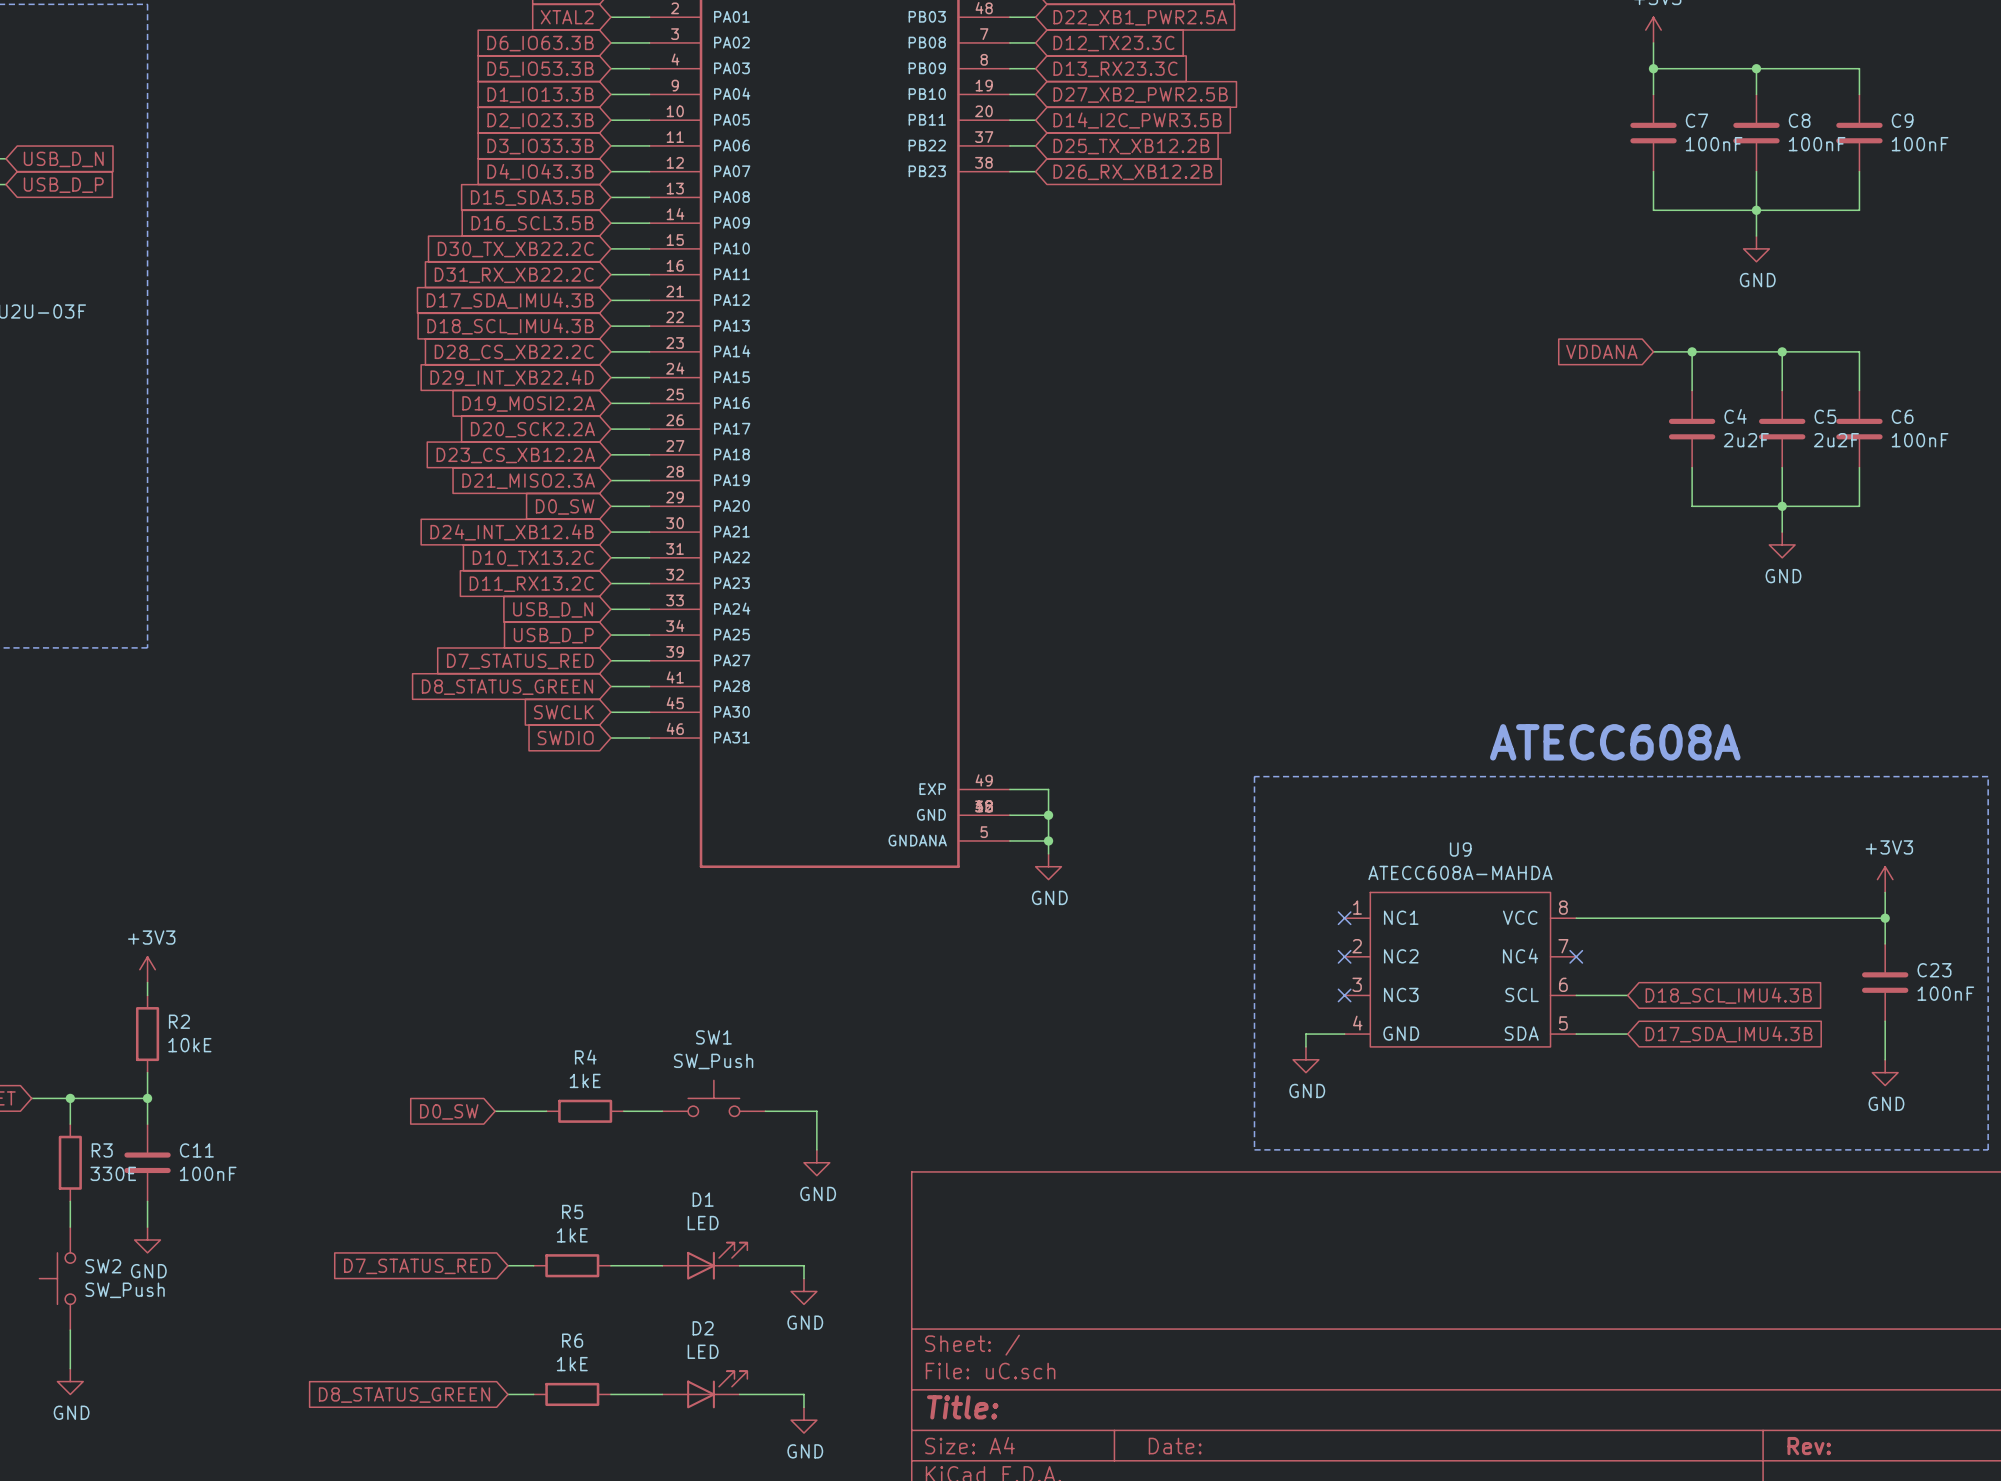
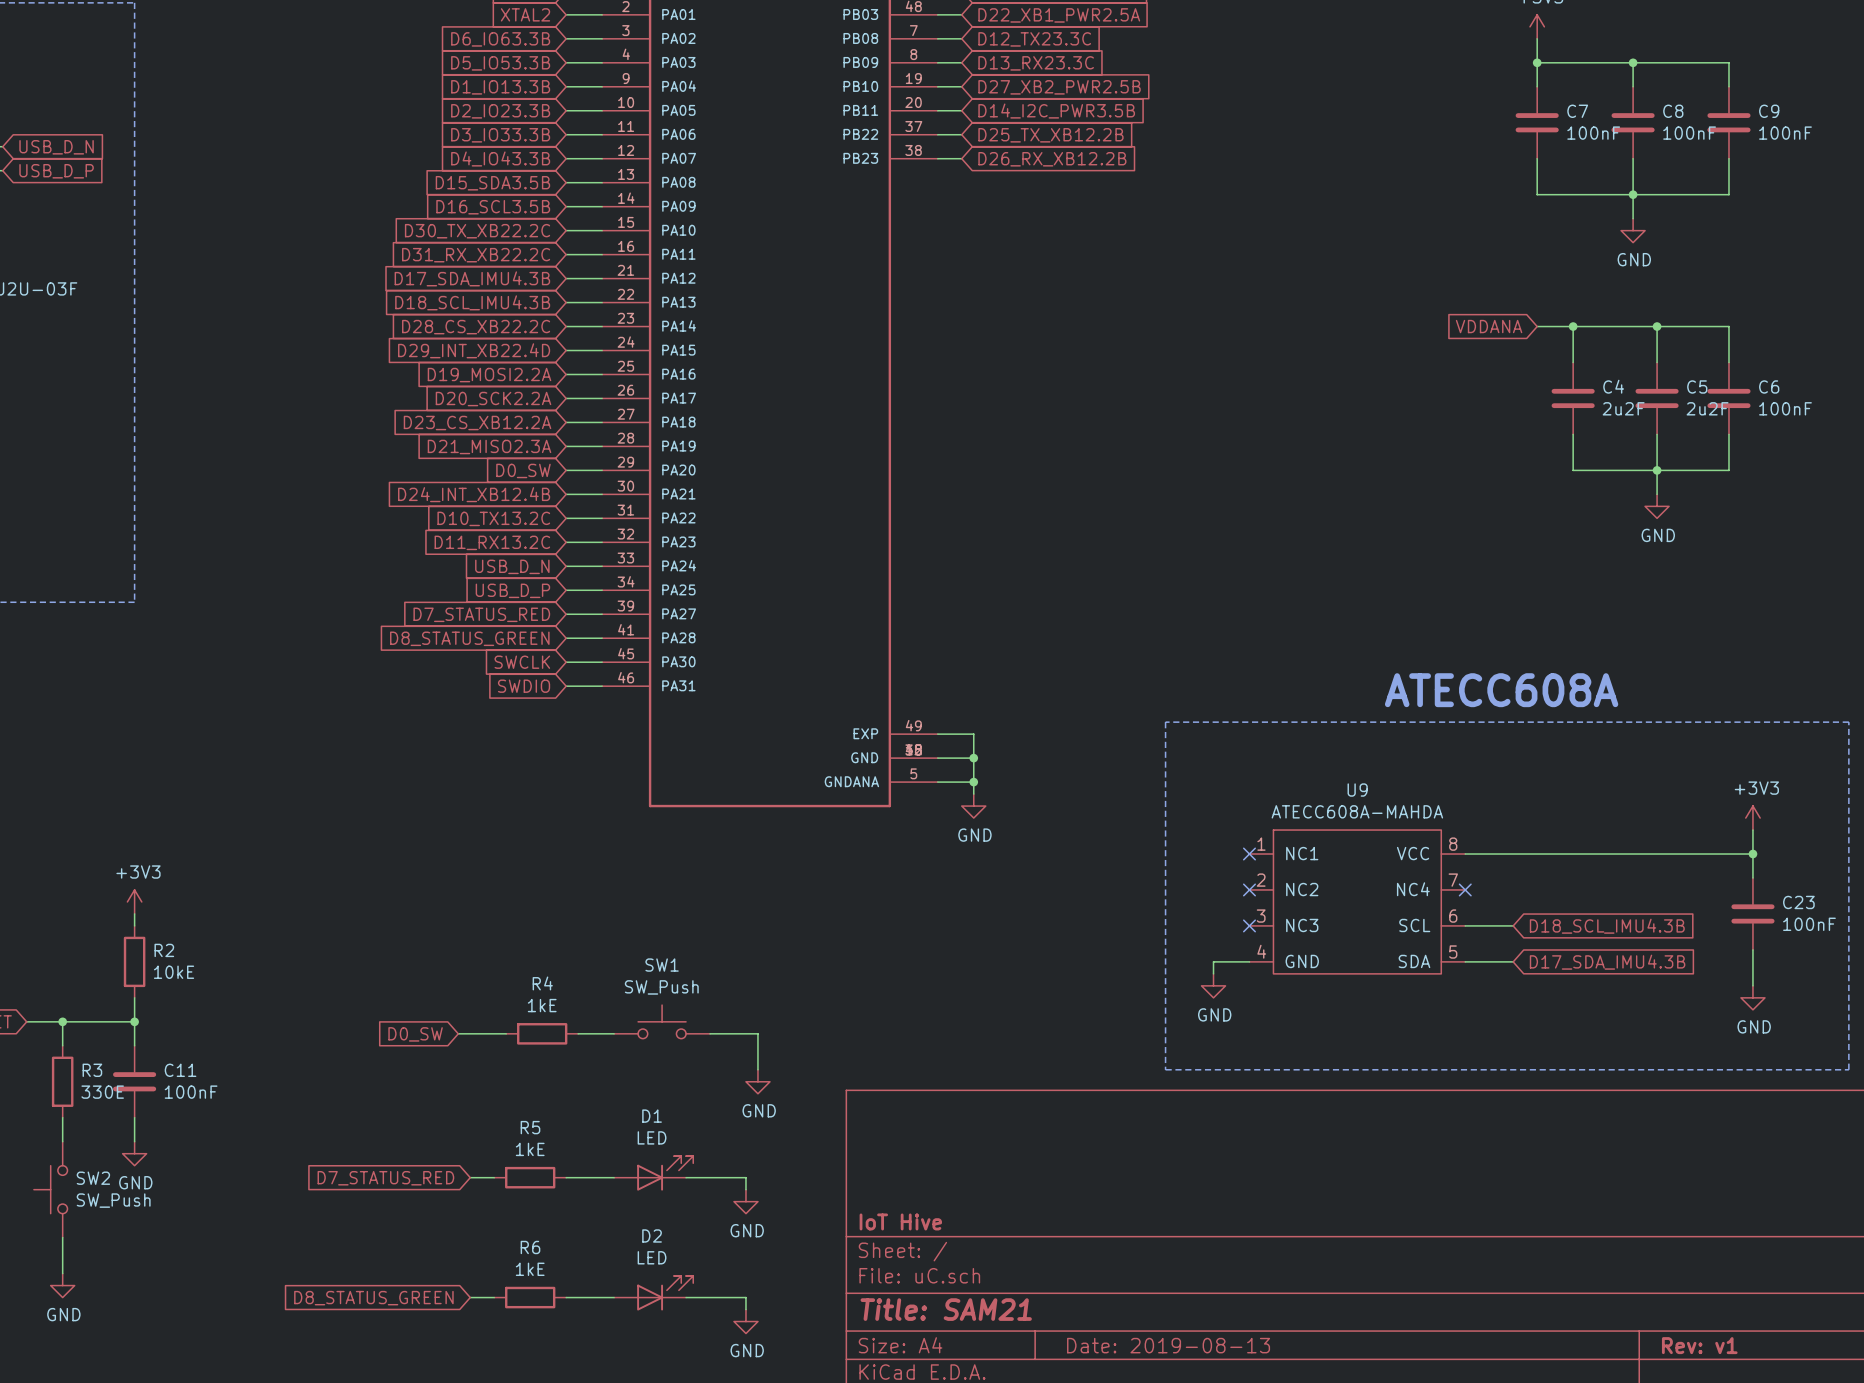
title block: none -> IoT Hive (900, 1221)
title block: Title: (962, 1407) -> Title: SAM21 (946, 1309)
title block: Date: (1175, 1446) -> Date: 2019-08-13 (1168, 1345)
title block: Rev: (1809, 1446) -> Rev: v1 (1699, 1345)

